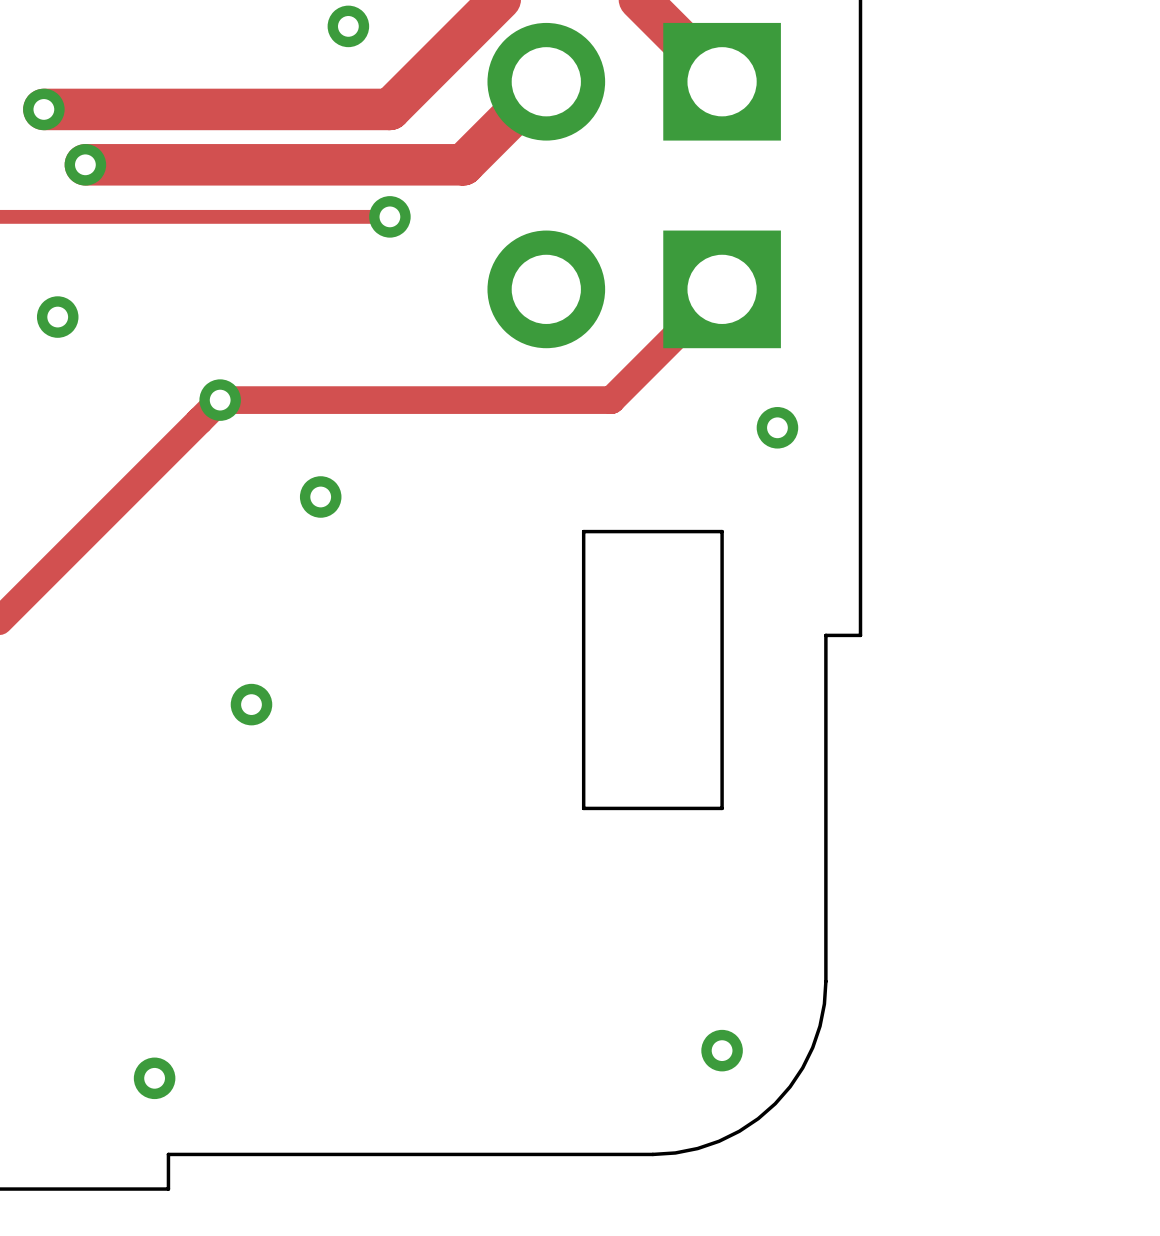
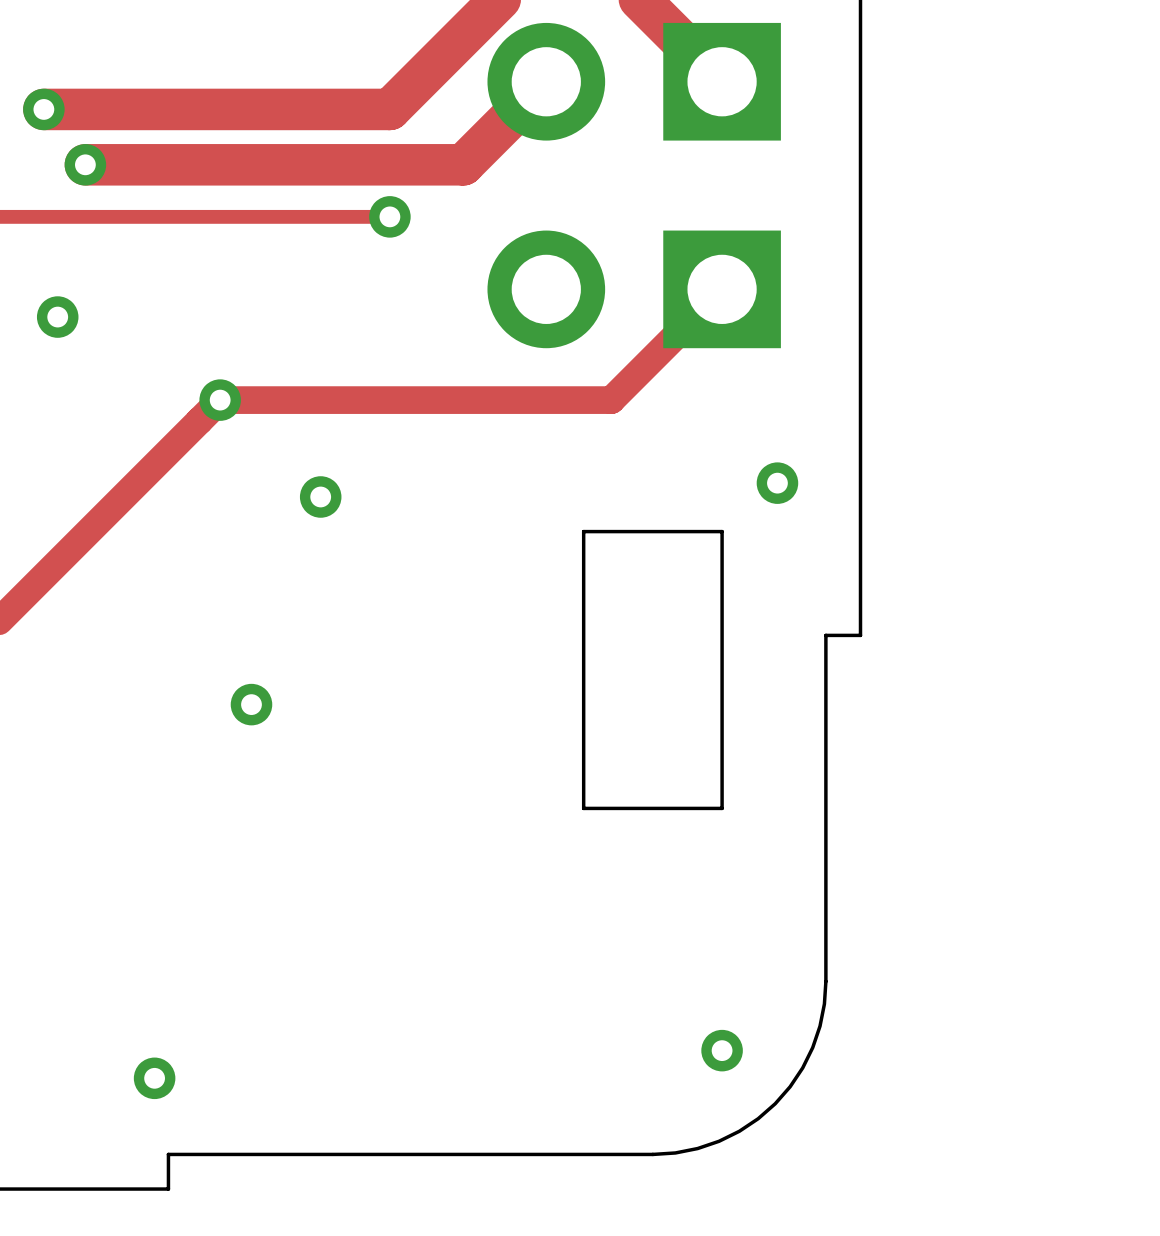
via: (348, 26) -> none
via position: (777, 427) -> (777, 483)

